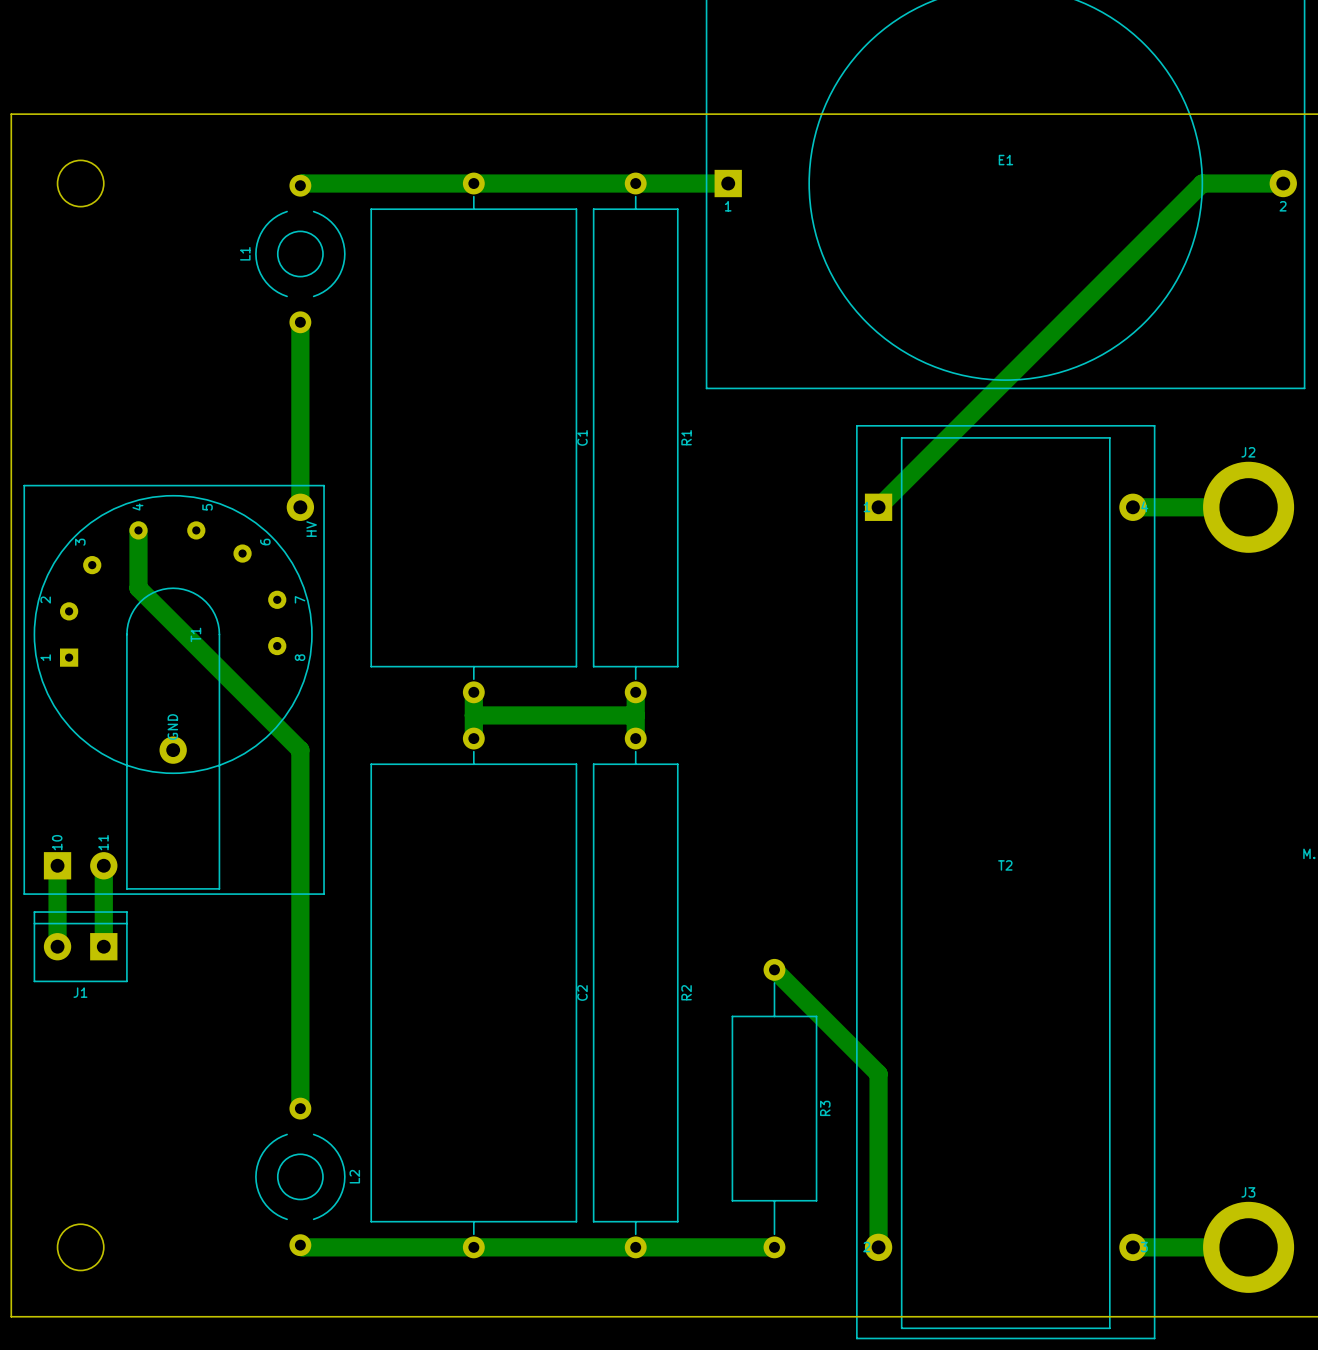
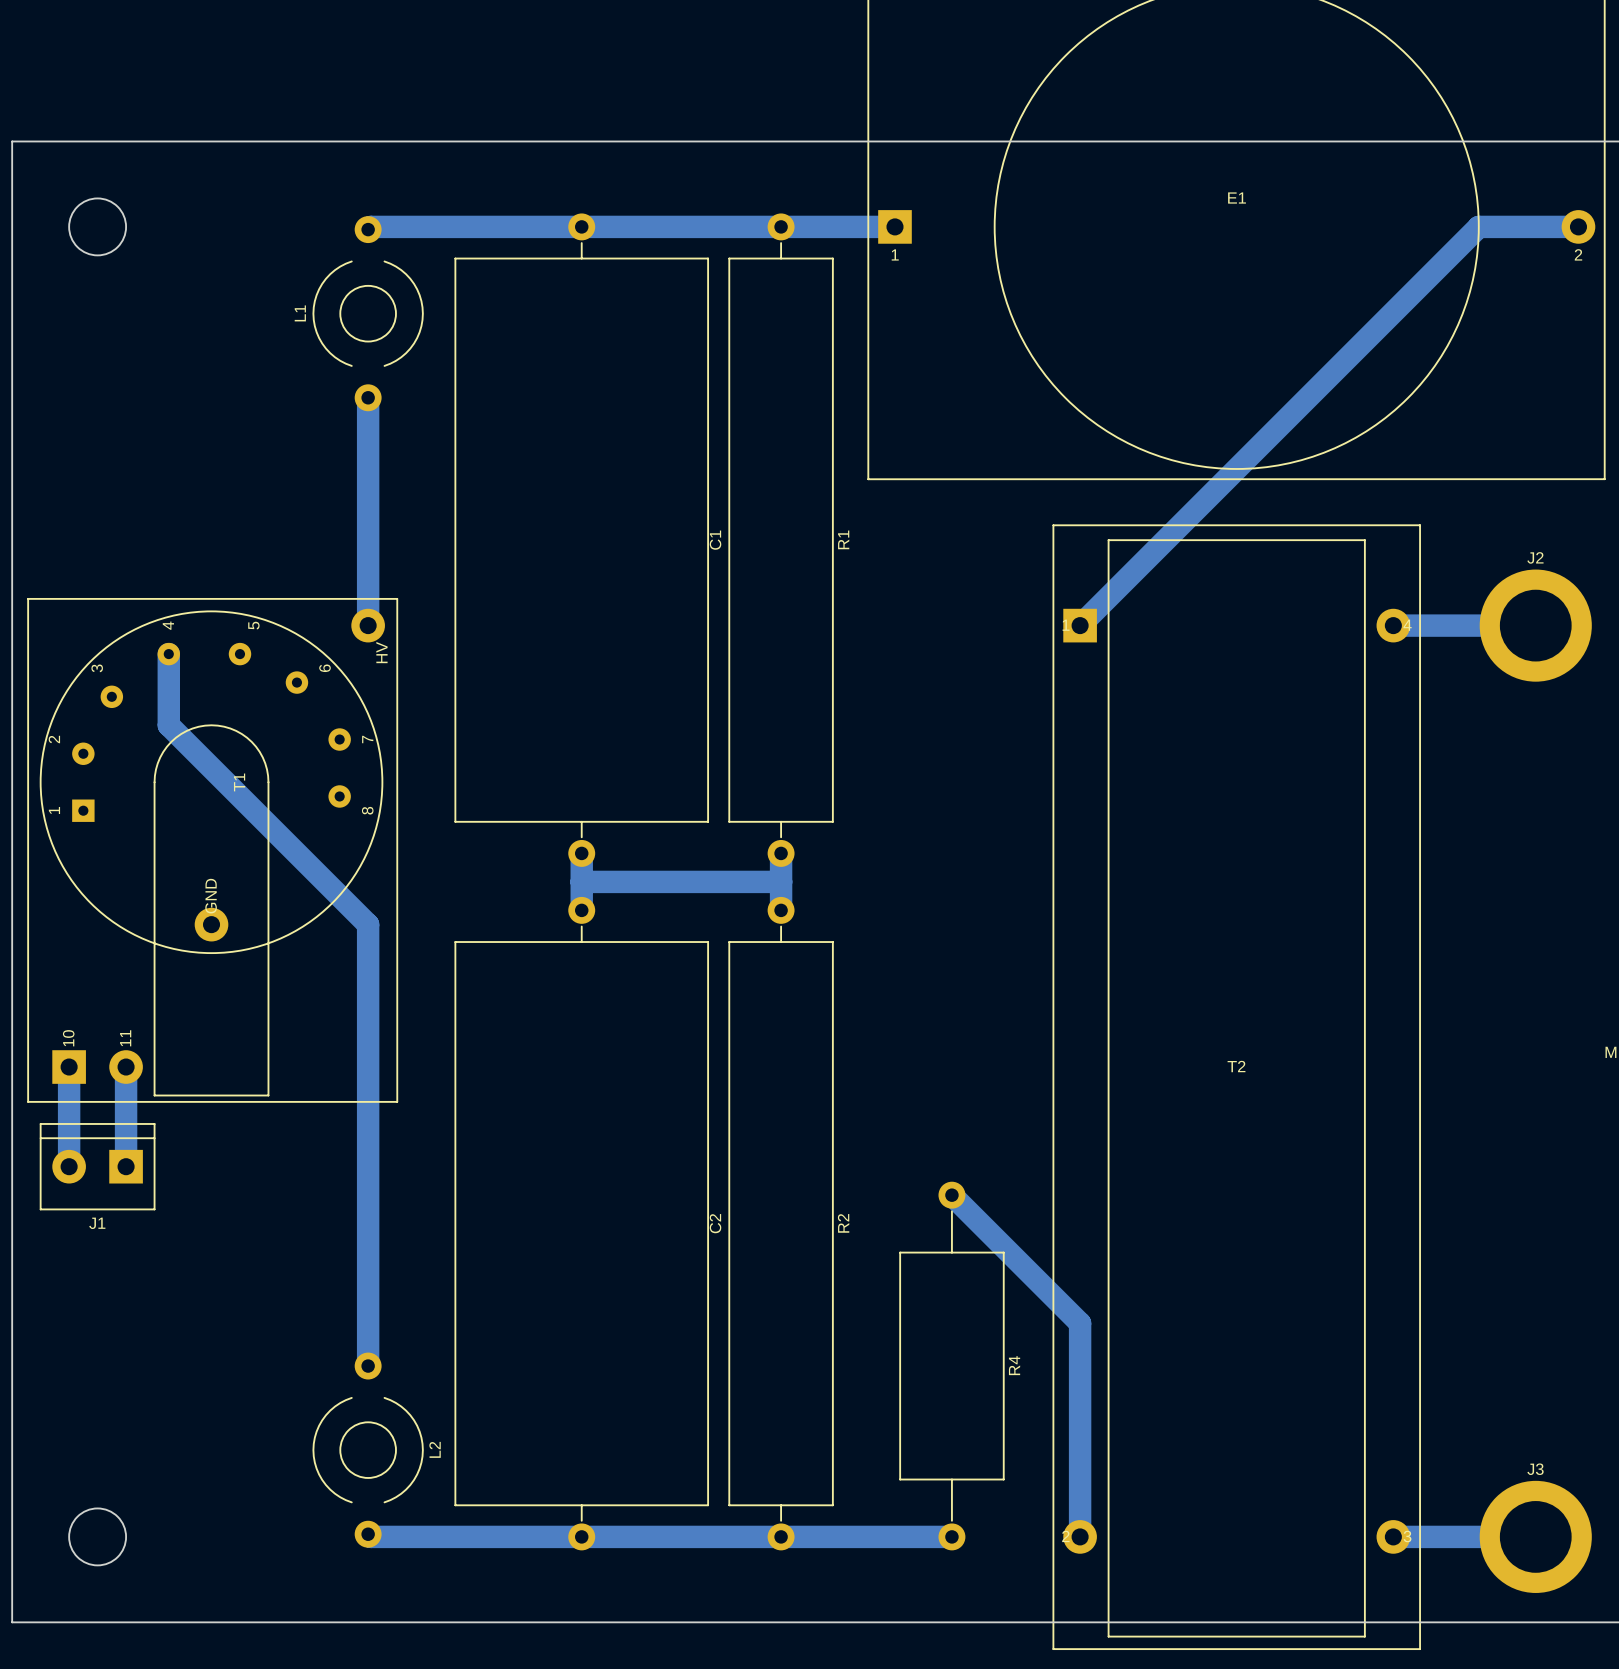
R3 name: R3 (825, 1108) -> R4 (1014, 1365)

